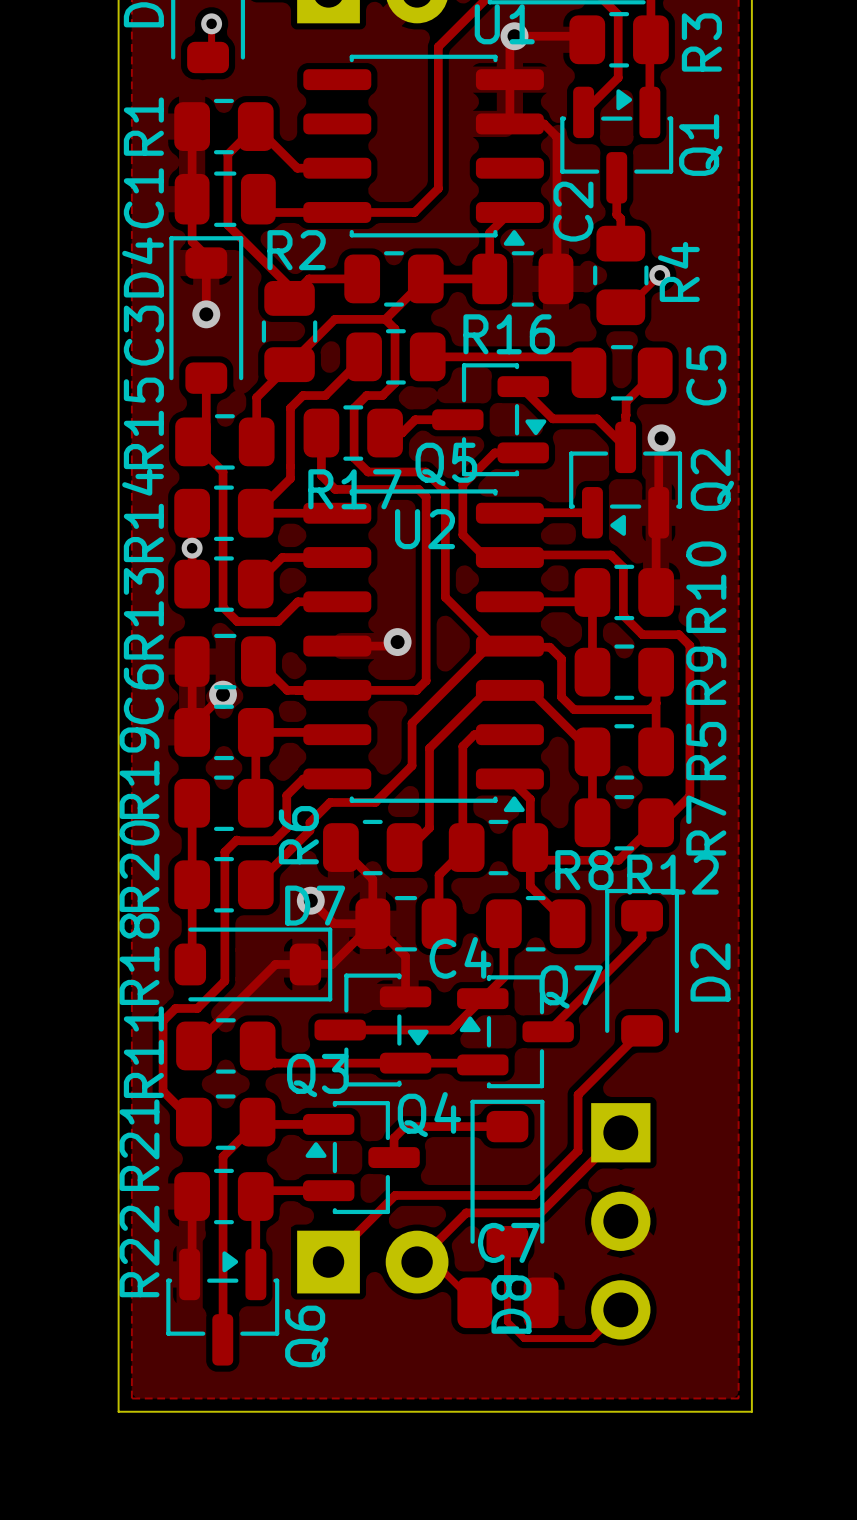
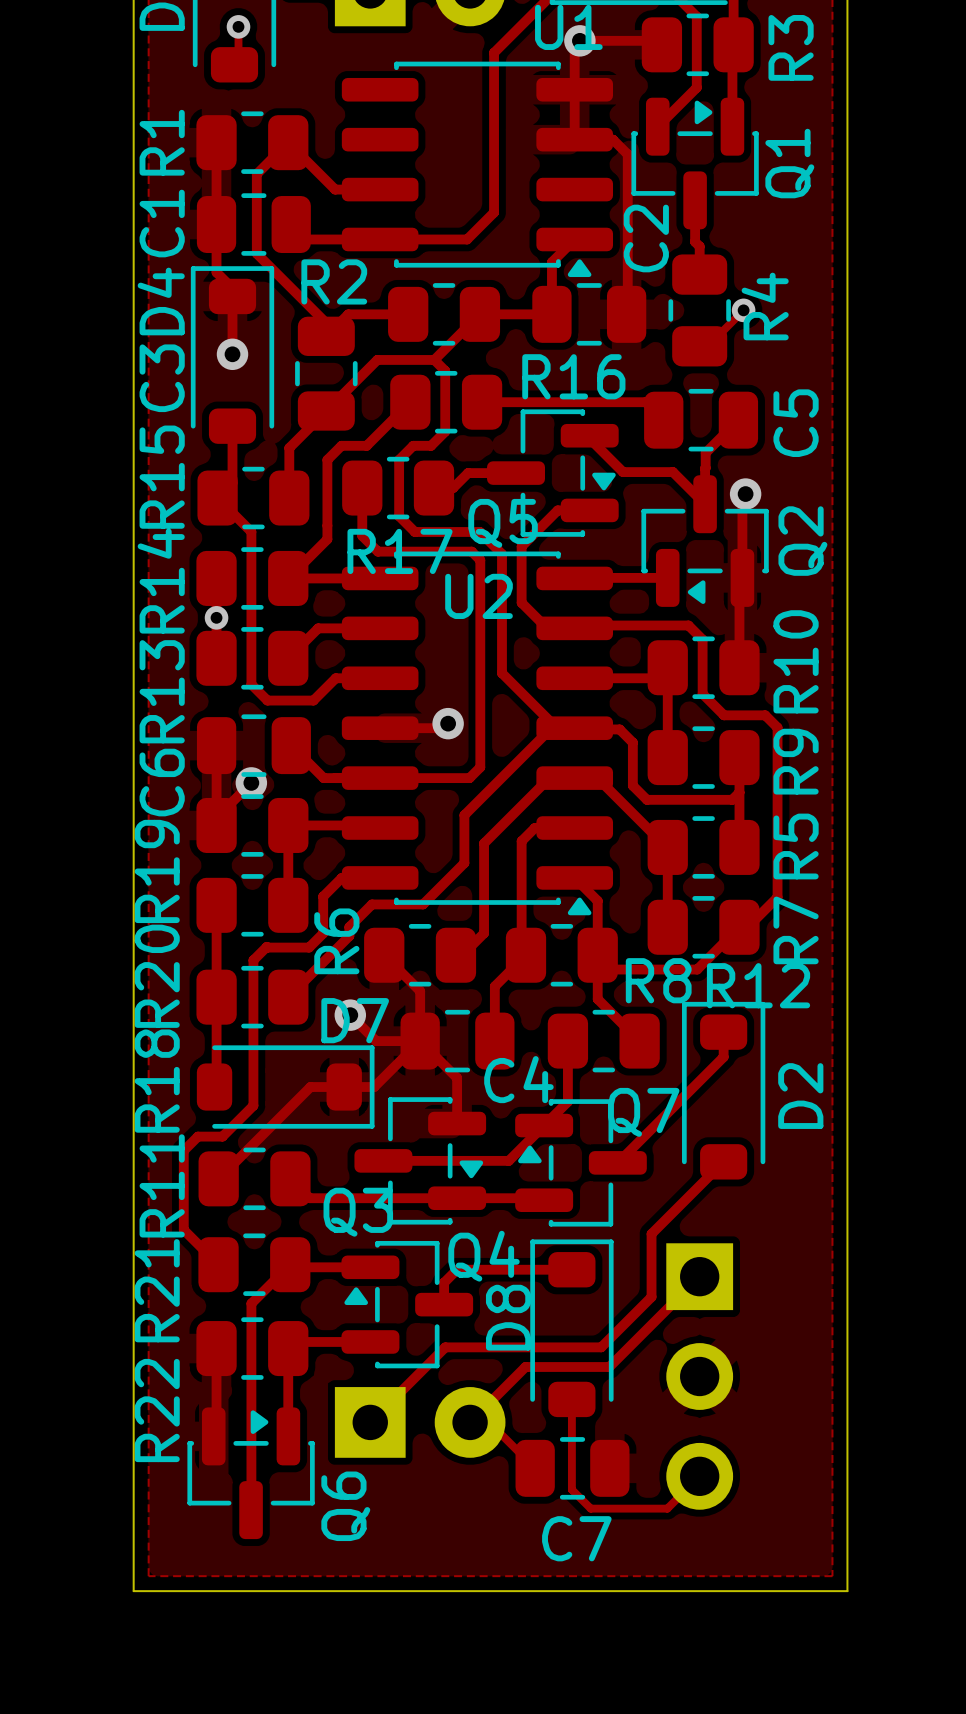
C7 name position: C7 (508, 1242) -> C7 (576, 1538)
D8 name position: D8 (511, 1304) -> D8 (508, 1317)

